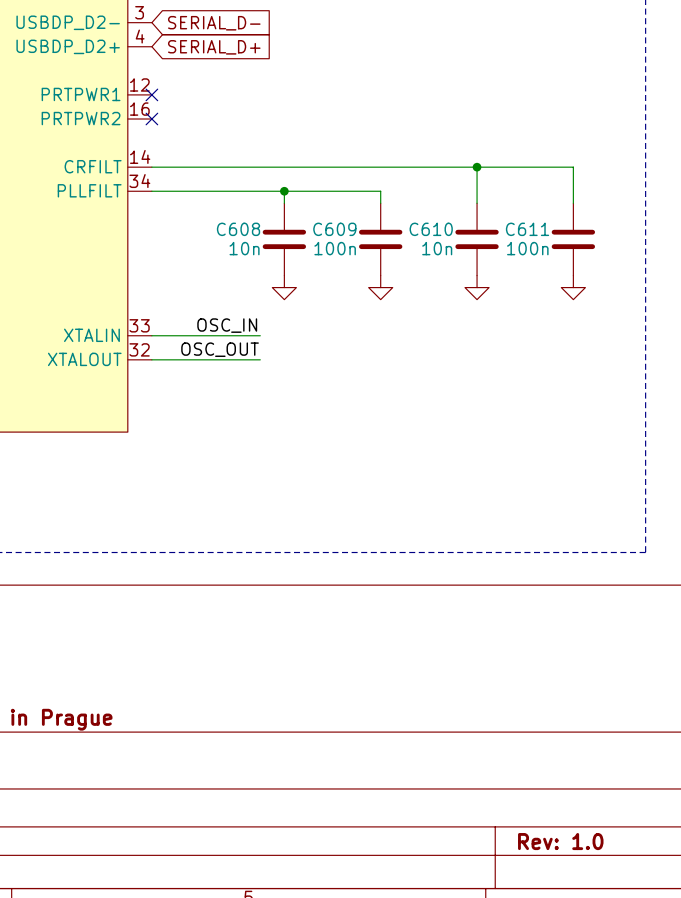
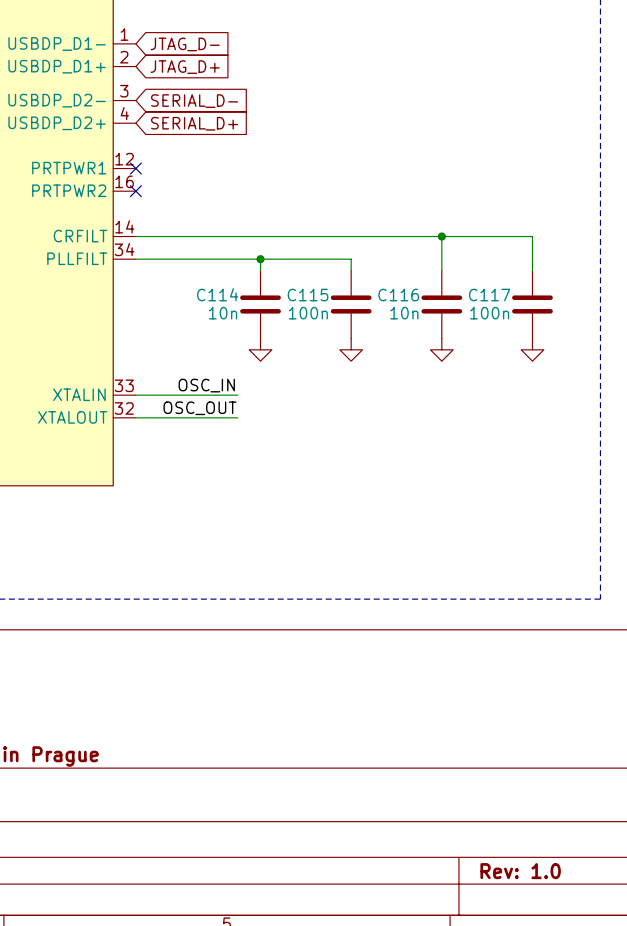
C608 name: C608 (238, 229) -> C114 (217, 294)
C609 name: C609 (334, 229) -> C115 (308, 295)
C610 name: C610 (431, 229) -> C116 (398, 295)
C611 name: C611 (527, 229) -> C117 (489, 295)

